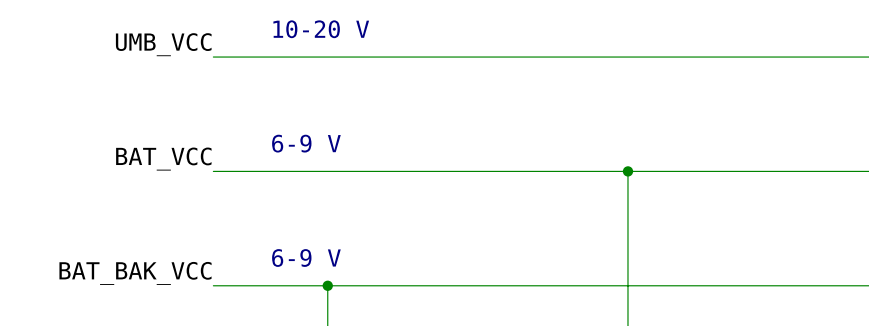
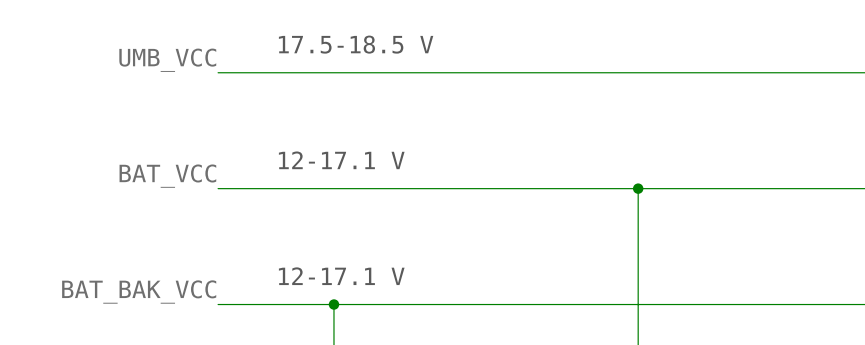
text: 10-20 V (321, 29) -> 17.5-18.5 V (356, 44)
text: 6-9 V (306, 143) -> 12-17.1 V (341, 160)
text: 6-9 V (306, 258) -> 12-17.1 V (341, 276)

